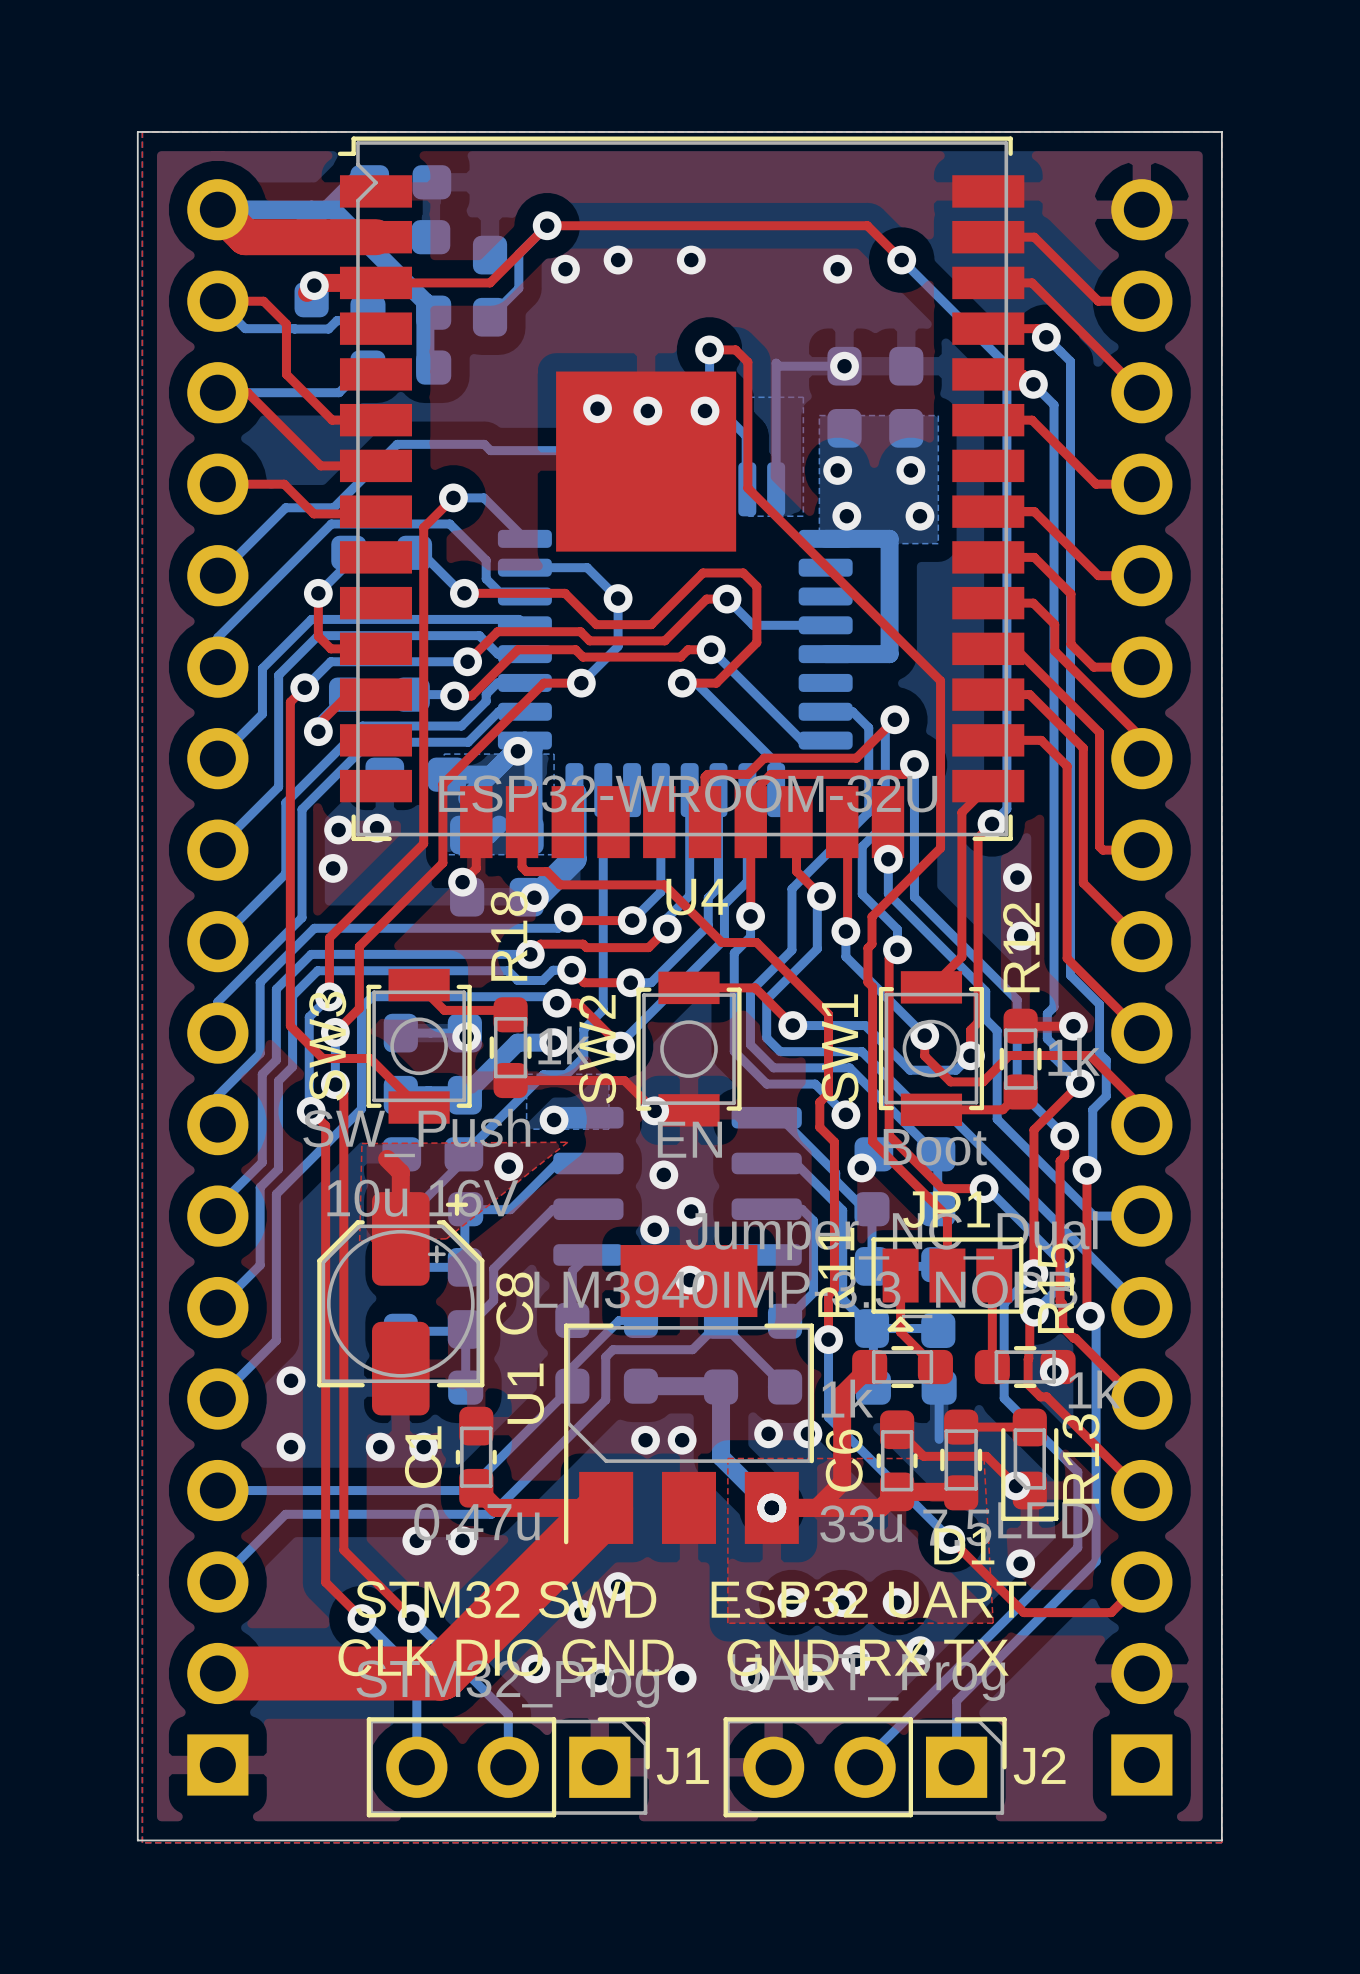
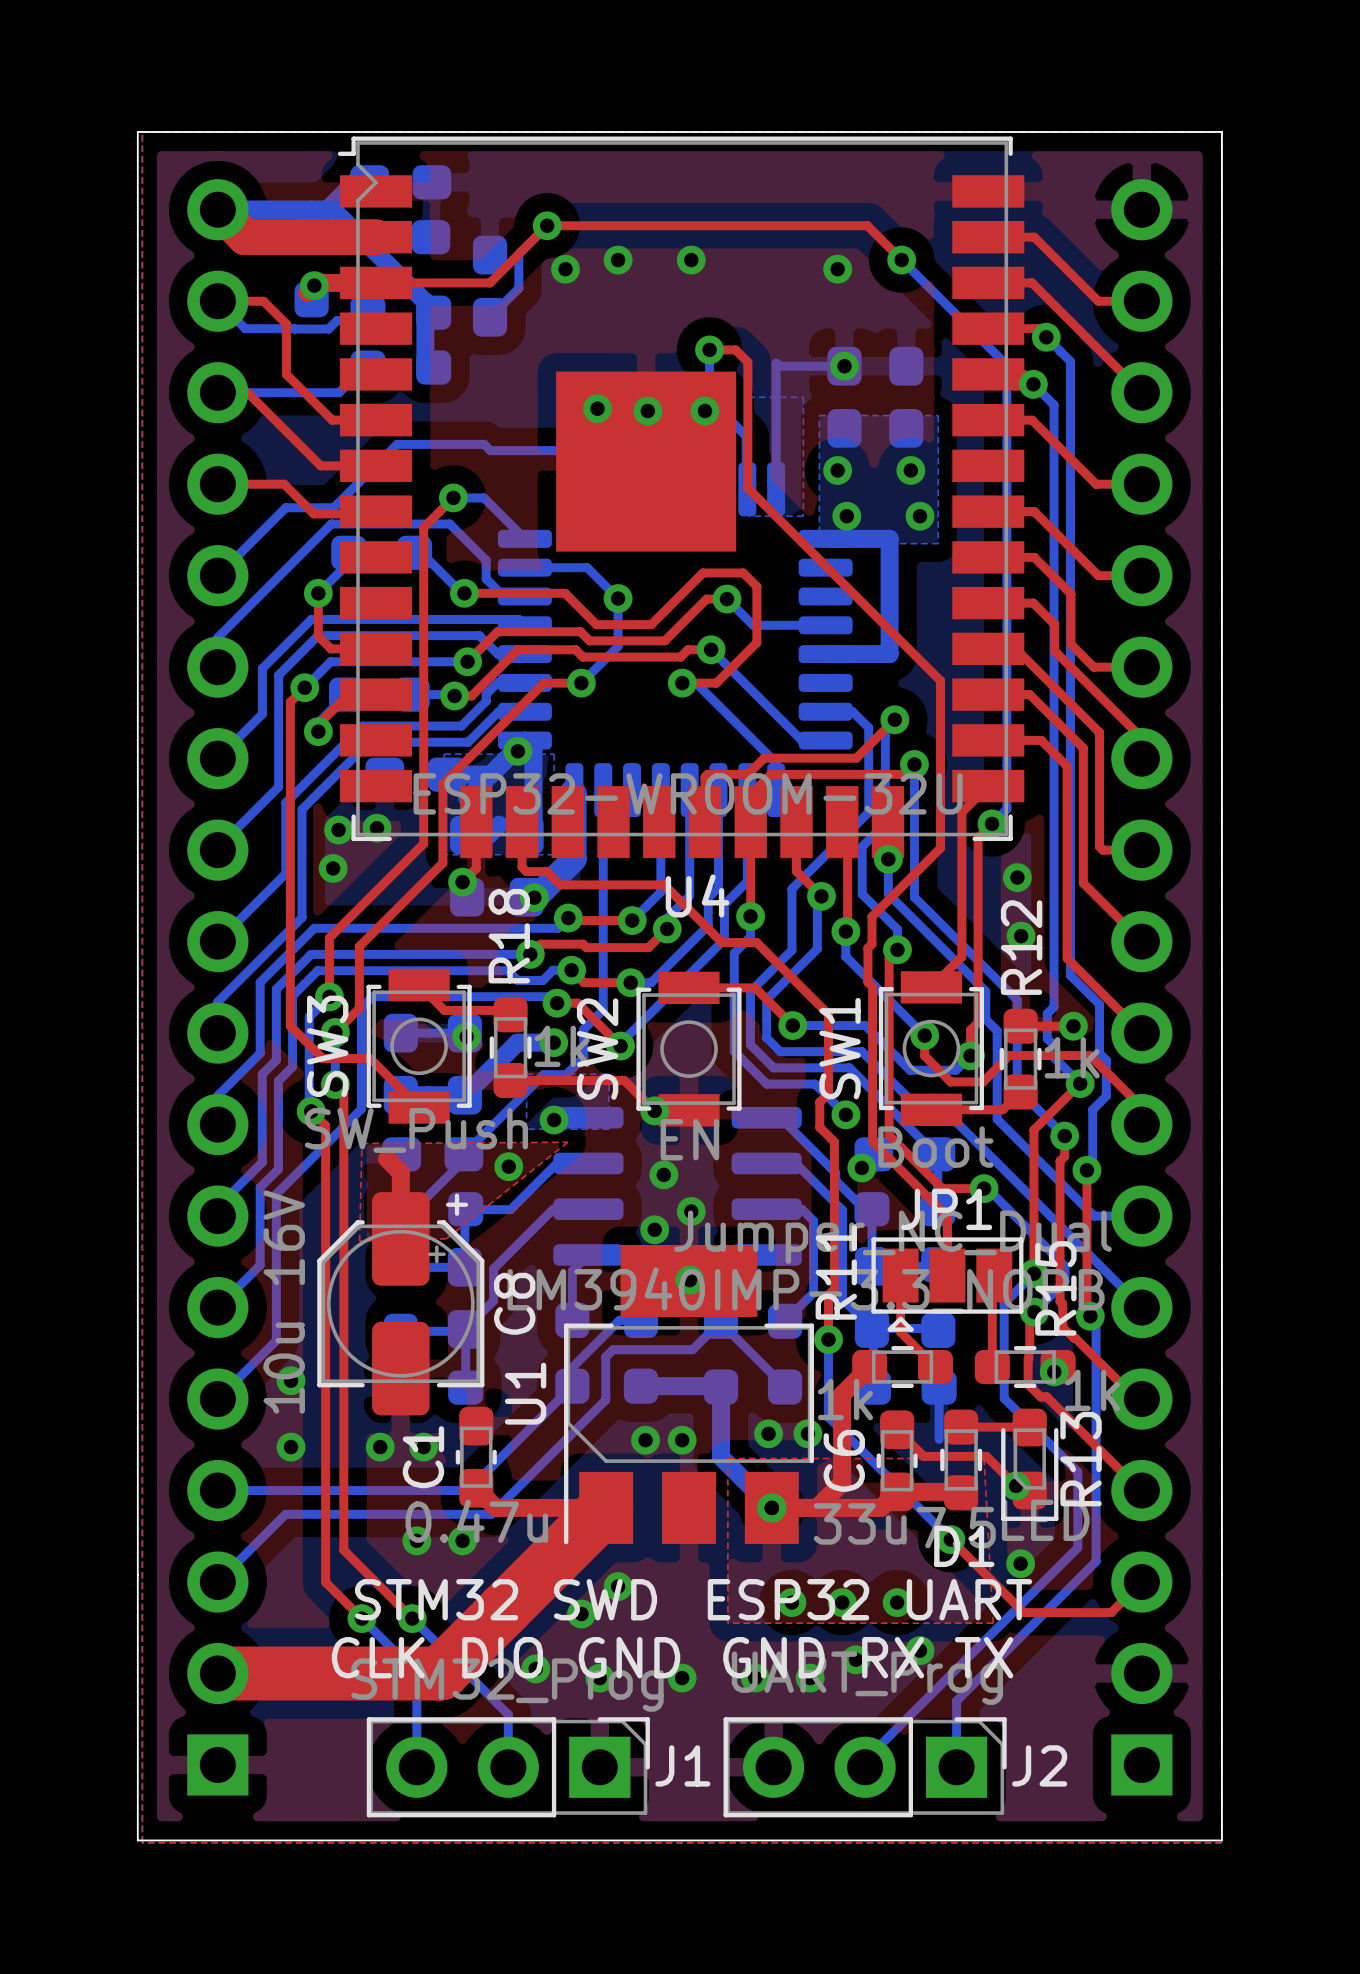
C8 value rotation: 0° (422, 1198) -> 90° counterclockwise (284, 1302)

